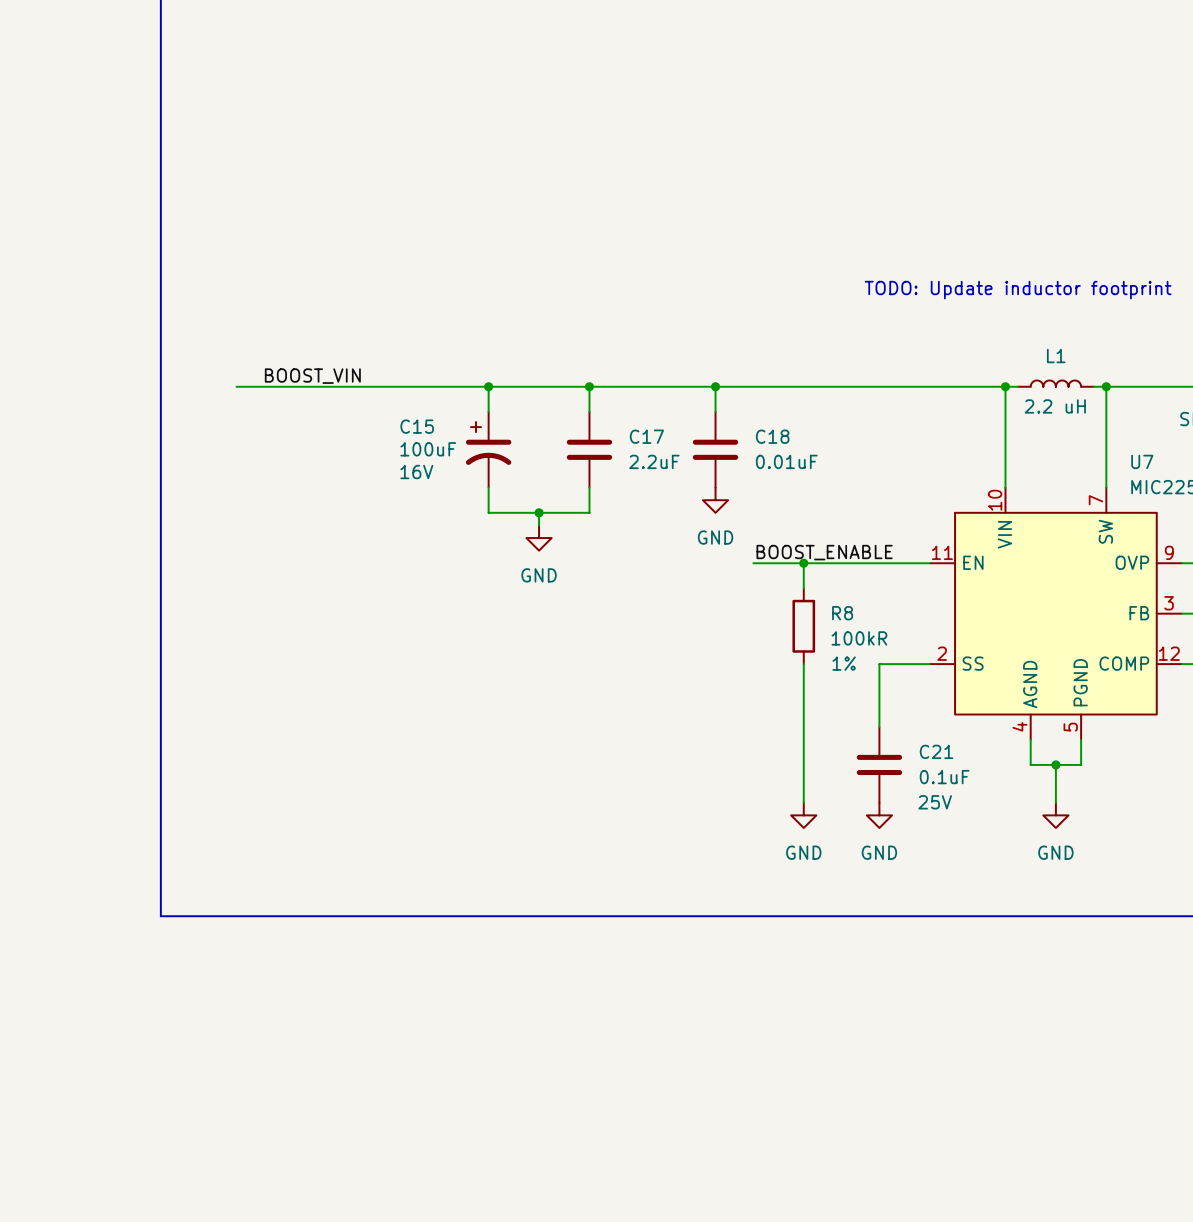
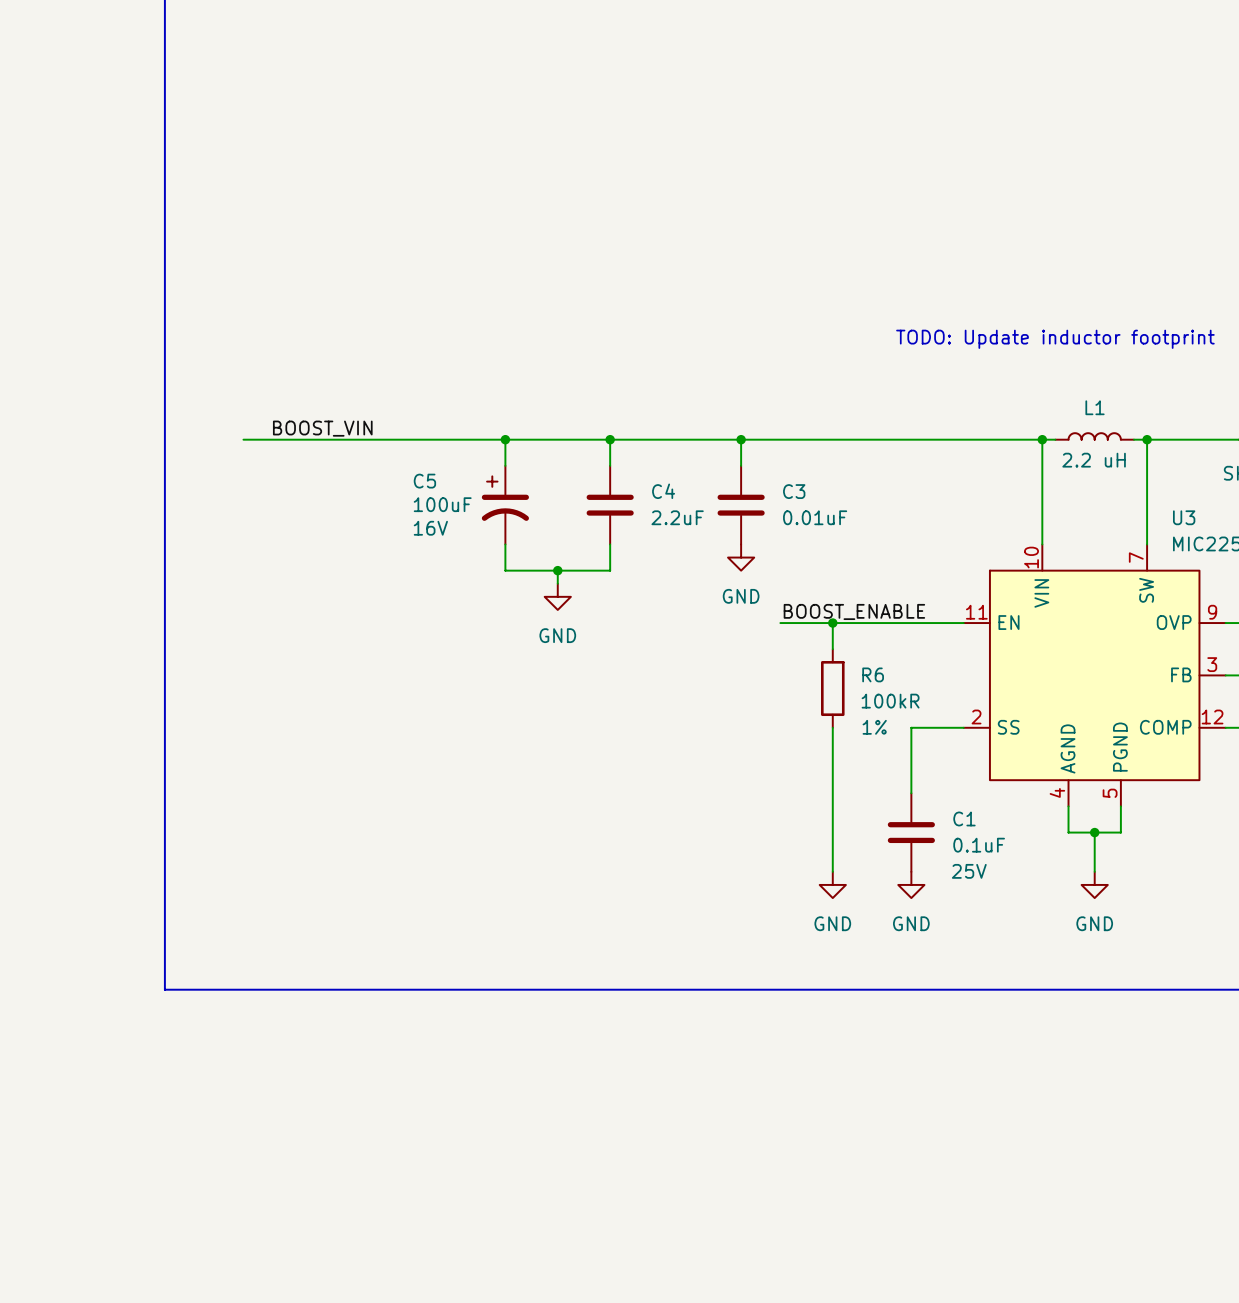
C15 name: C15 (417, 426) -> C5 (424, 481)
C17 name: C17 (646, 436) -> C4 (663, 491)
C18 name: C18 (772, 436) -> C3 (794, 491)
U7 name: U7 (1142, 461) -> U3 (1184, 517)
R8 name: R8 (842, 613) -> R6 (873, 674)
C21 name: C21 (936, 751) -> C1 (964, 818)

